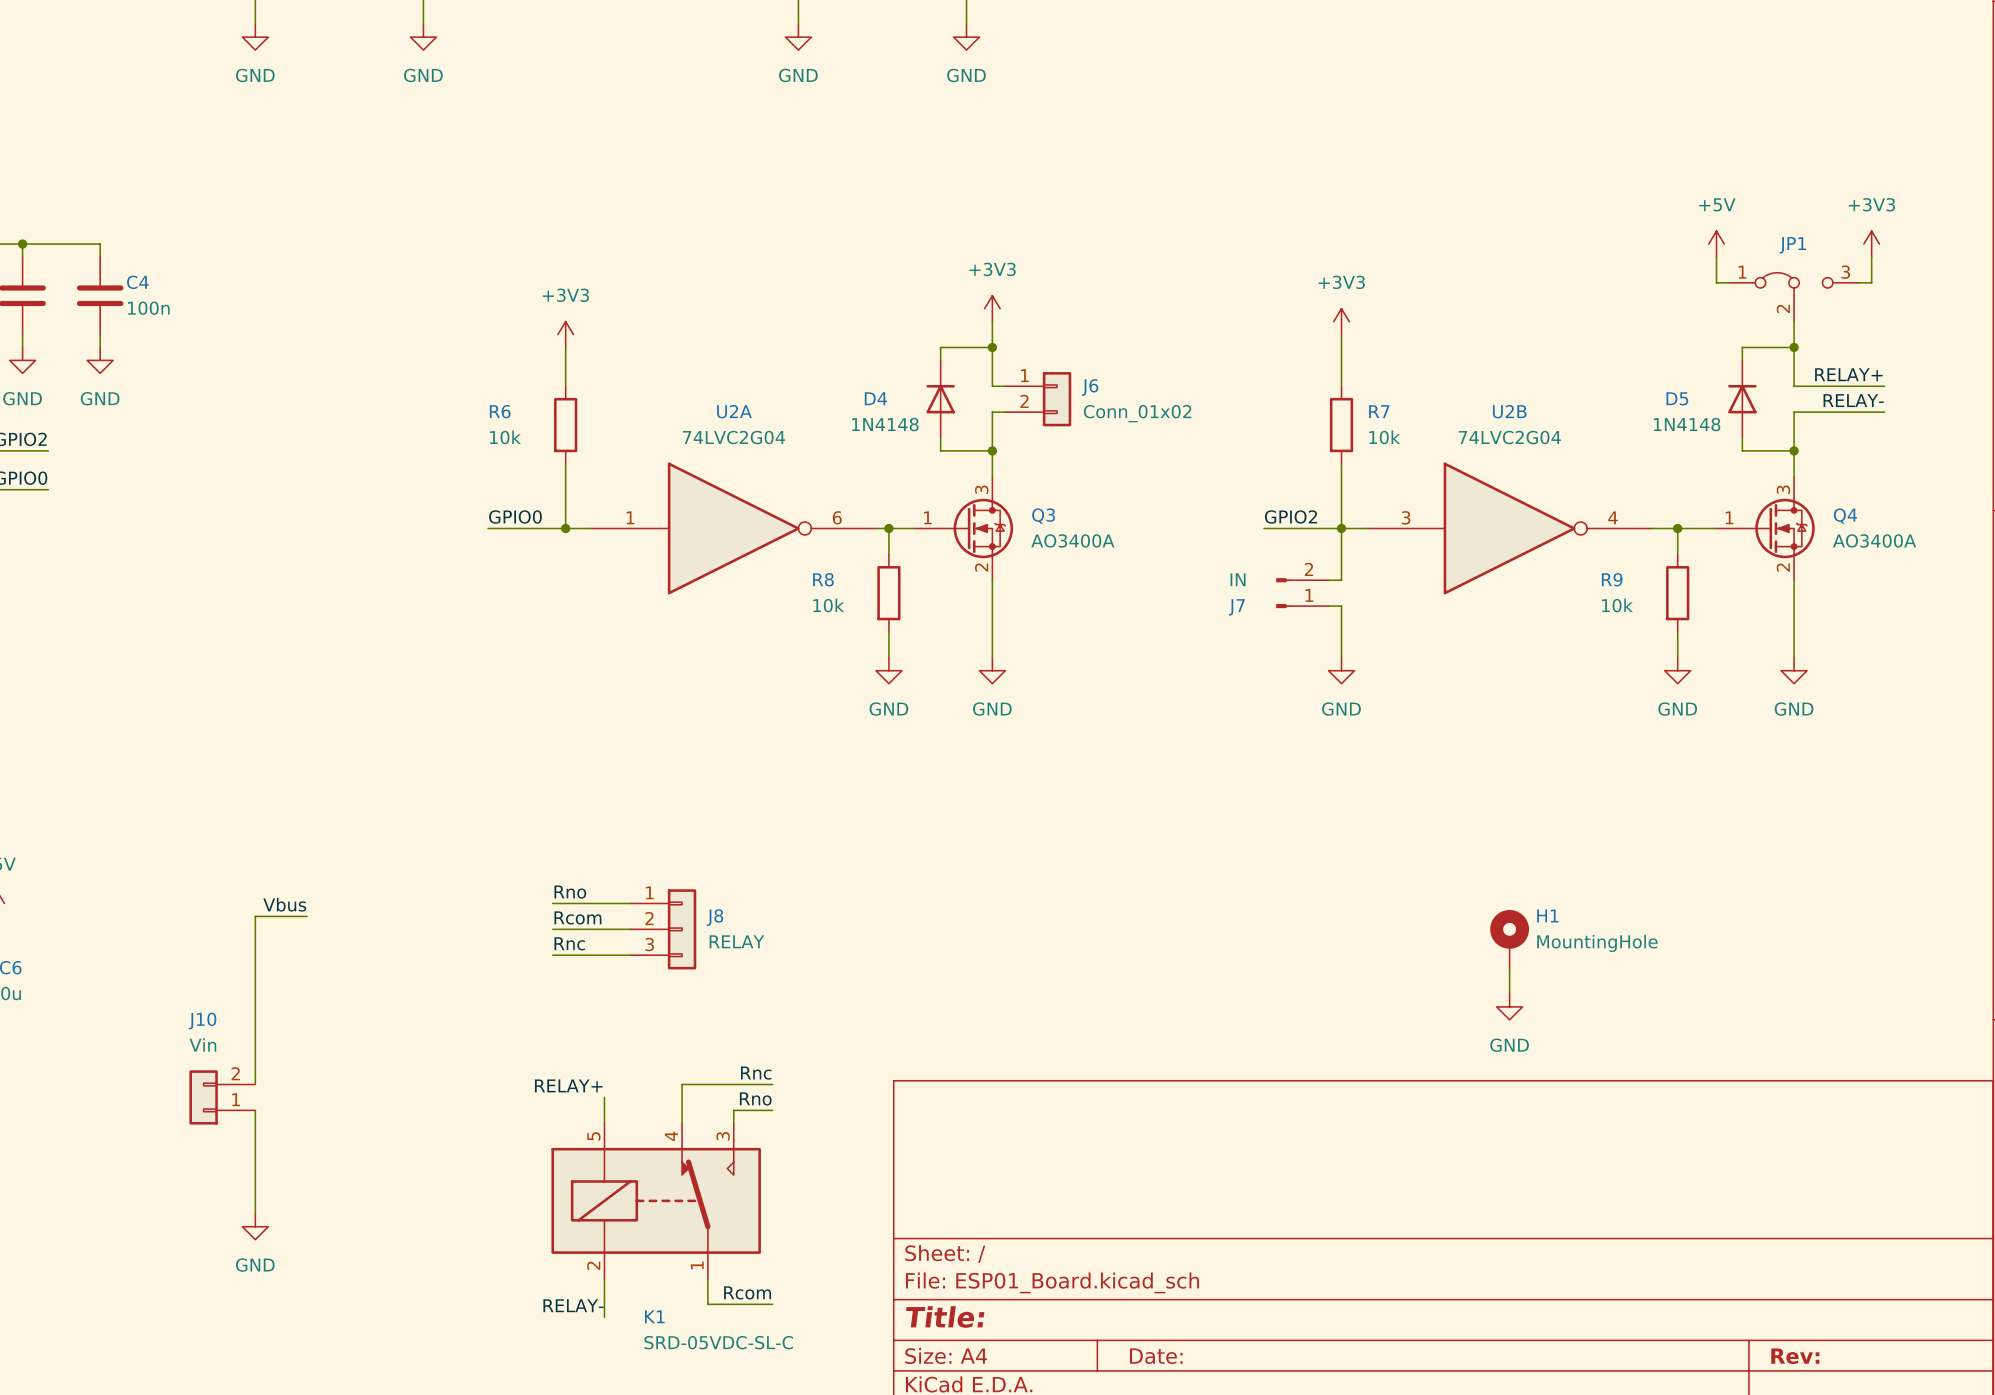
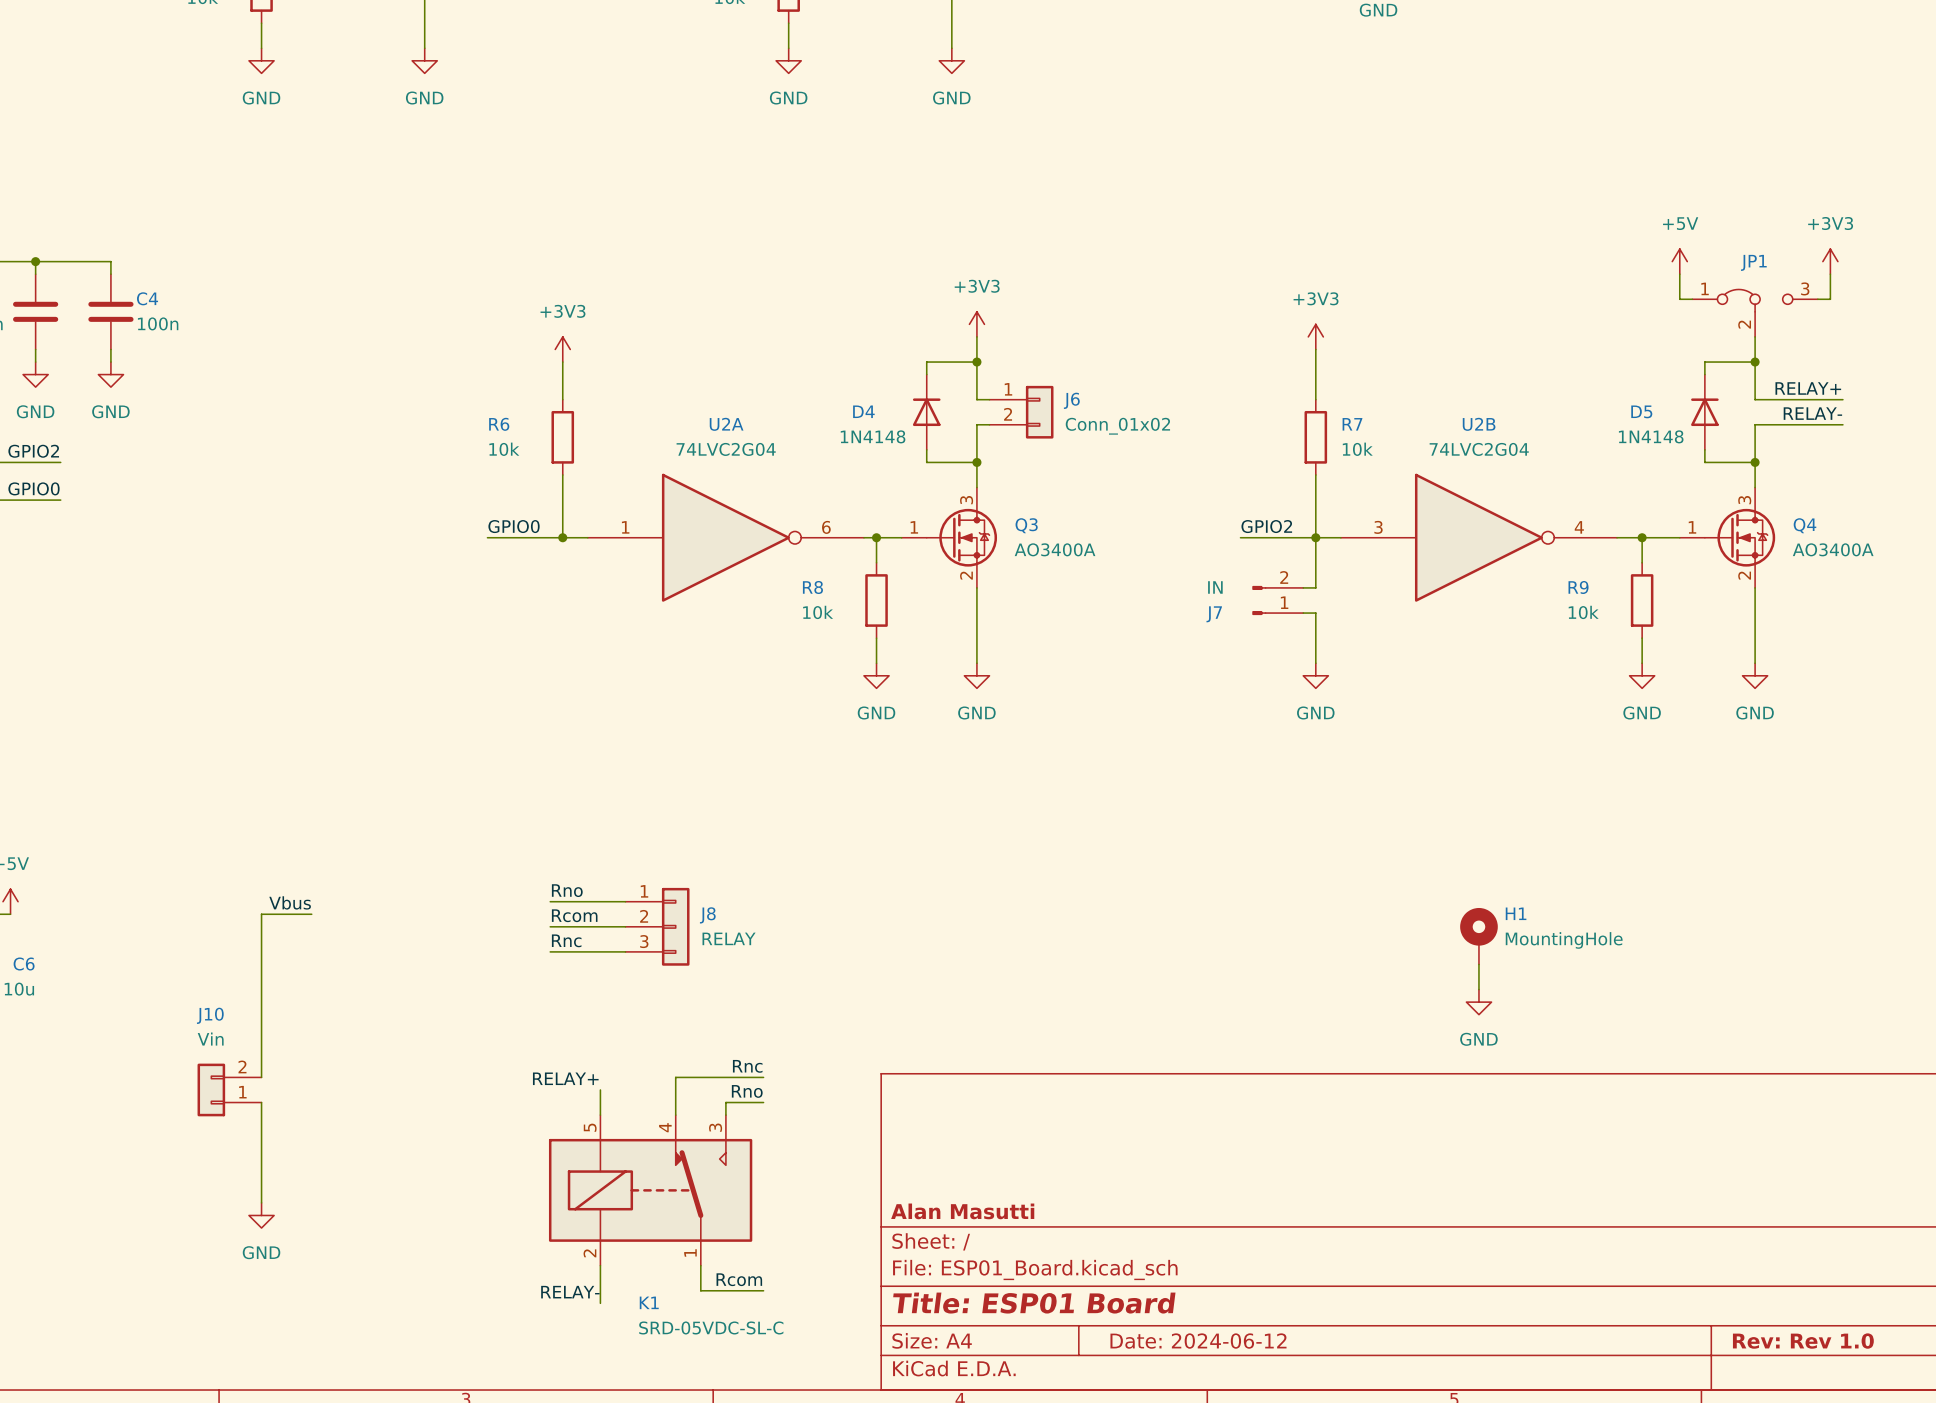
title block: none -> Alan Masutti (962, 1211)
title block: Title: (945, 1316) -> Title: ESP01 Board (1034, 1303)
title block: Date: (1156, 1356) -> Date: 2024-06-12 (1198, 1341)
title block: Rev: (1795, 1356) -> Rev: Rev 1.0 (1803, 1341)

